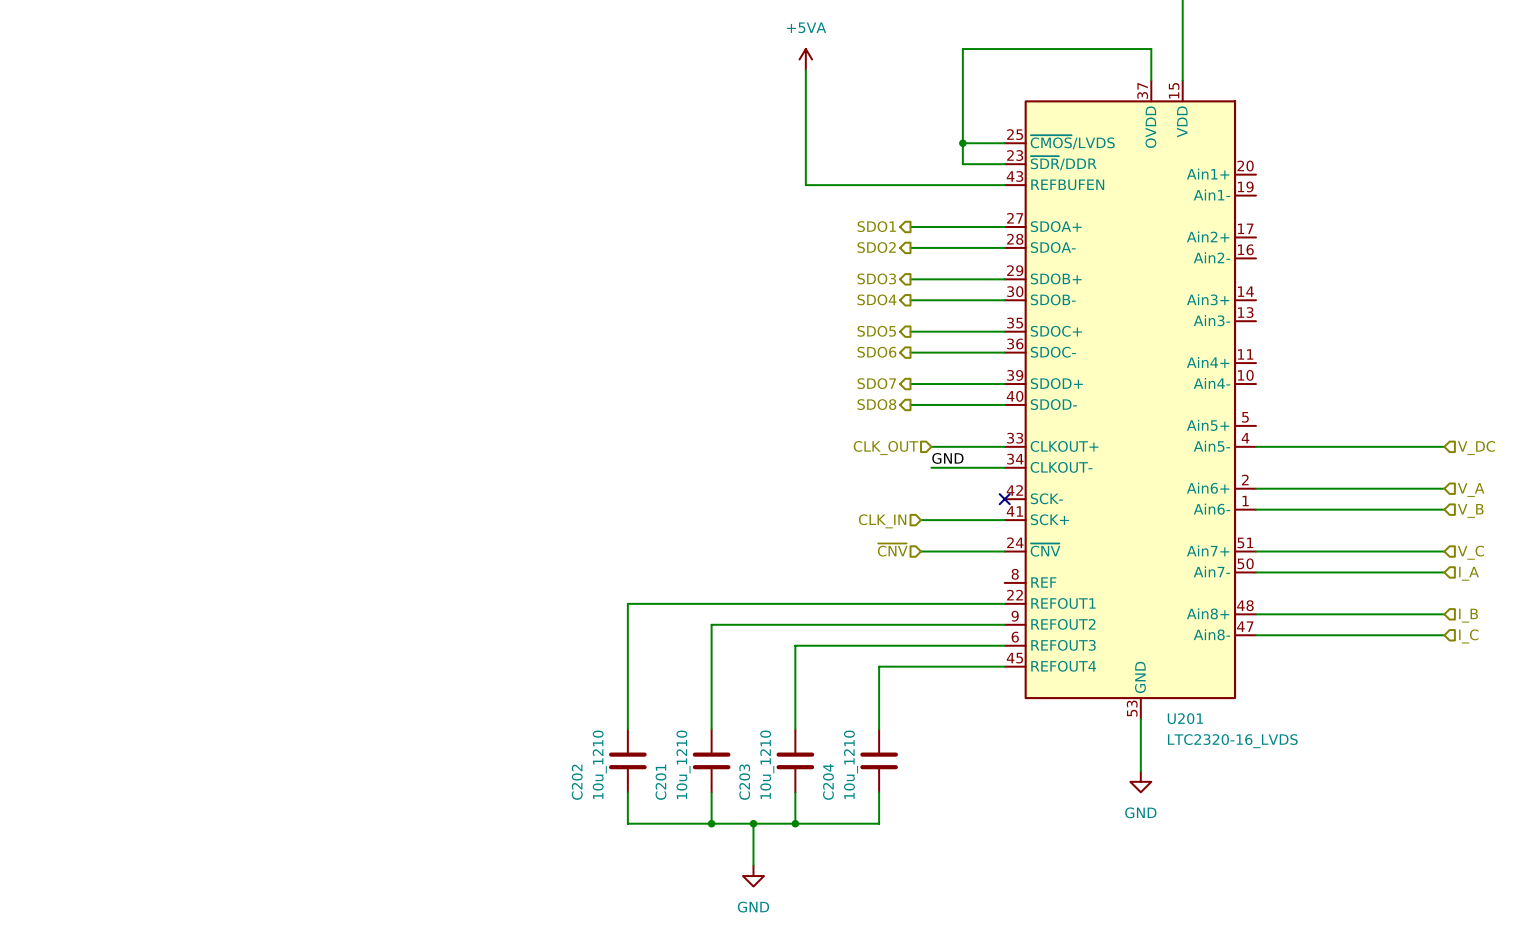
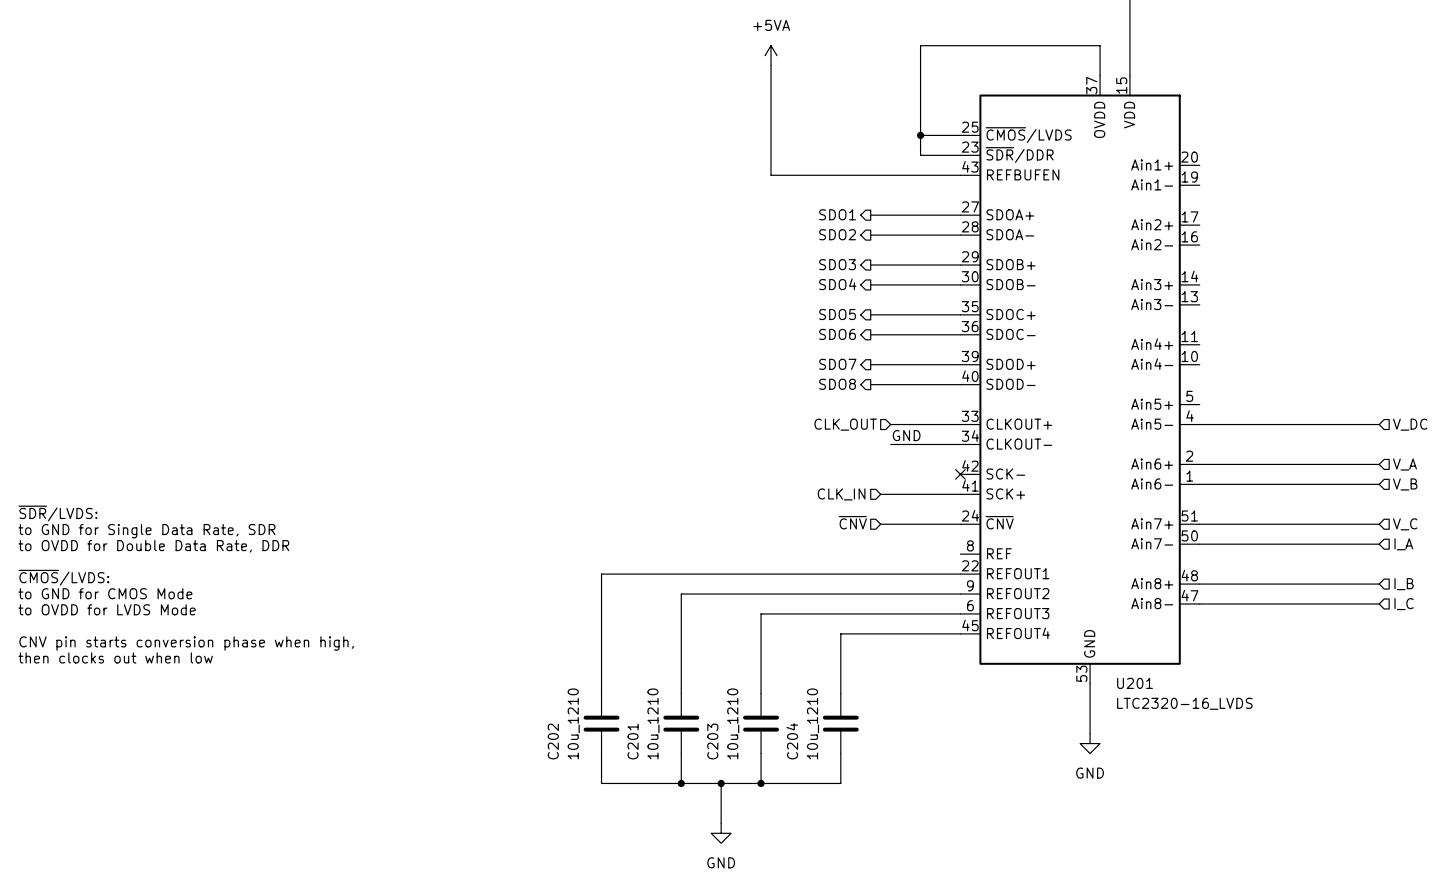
text: none -> ~{SDR}/LVDS: (57, 513)
text: none -> to GND for Single Data Rate, SDR (146, 531)
text: none -> to OVDD for Double Data Rate, DDR (153, 546)
text: none -> ~{CMOS}/LVDS: (63, 577)
text: none -> to GND for CMOS Mode (105, 593)
text: none -> to OVDD for LVDS Mode (107, 609)
text: none -> CNV pin starts conversion phase when high, (186, 643)
text: none -> then clocks out when low (115, 657)

